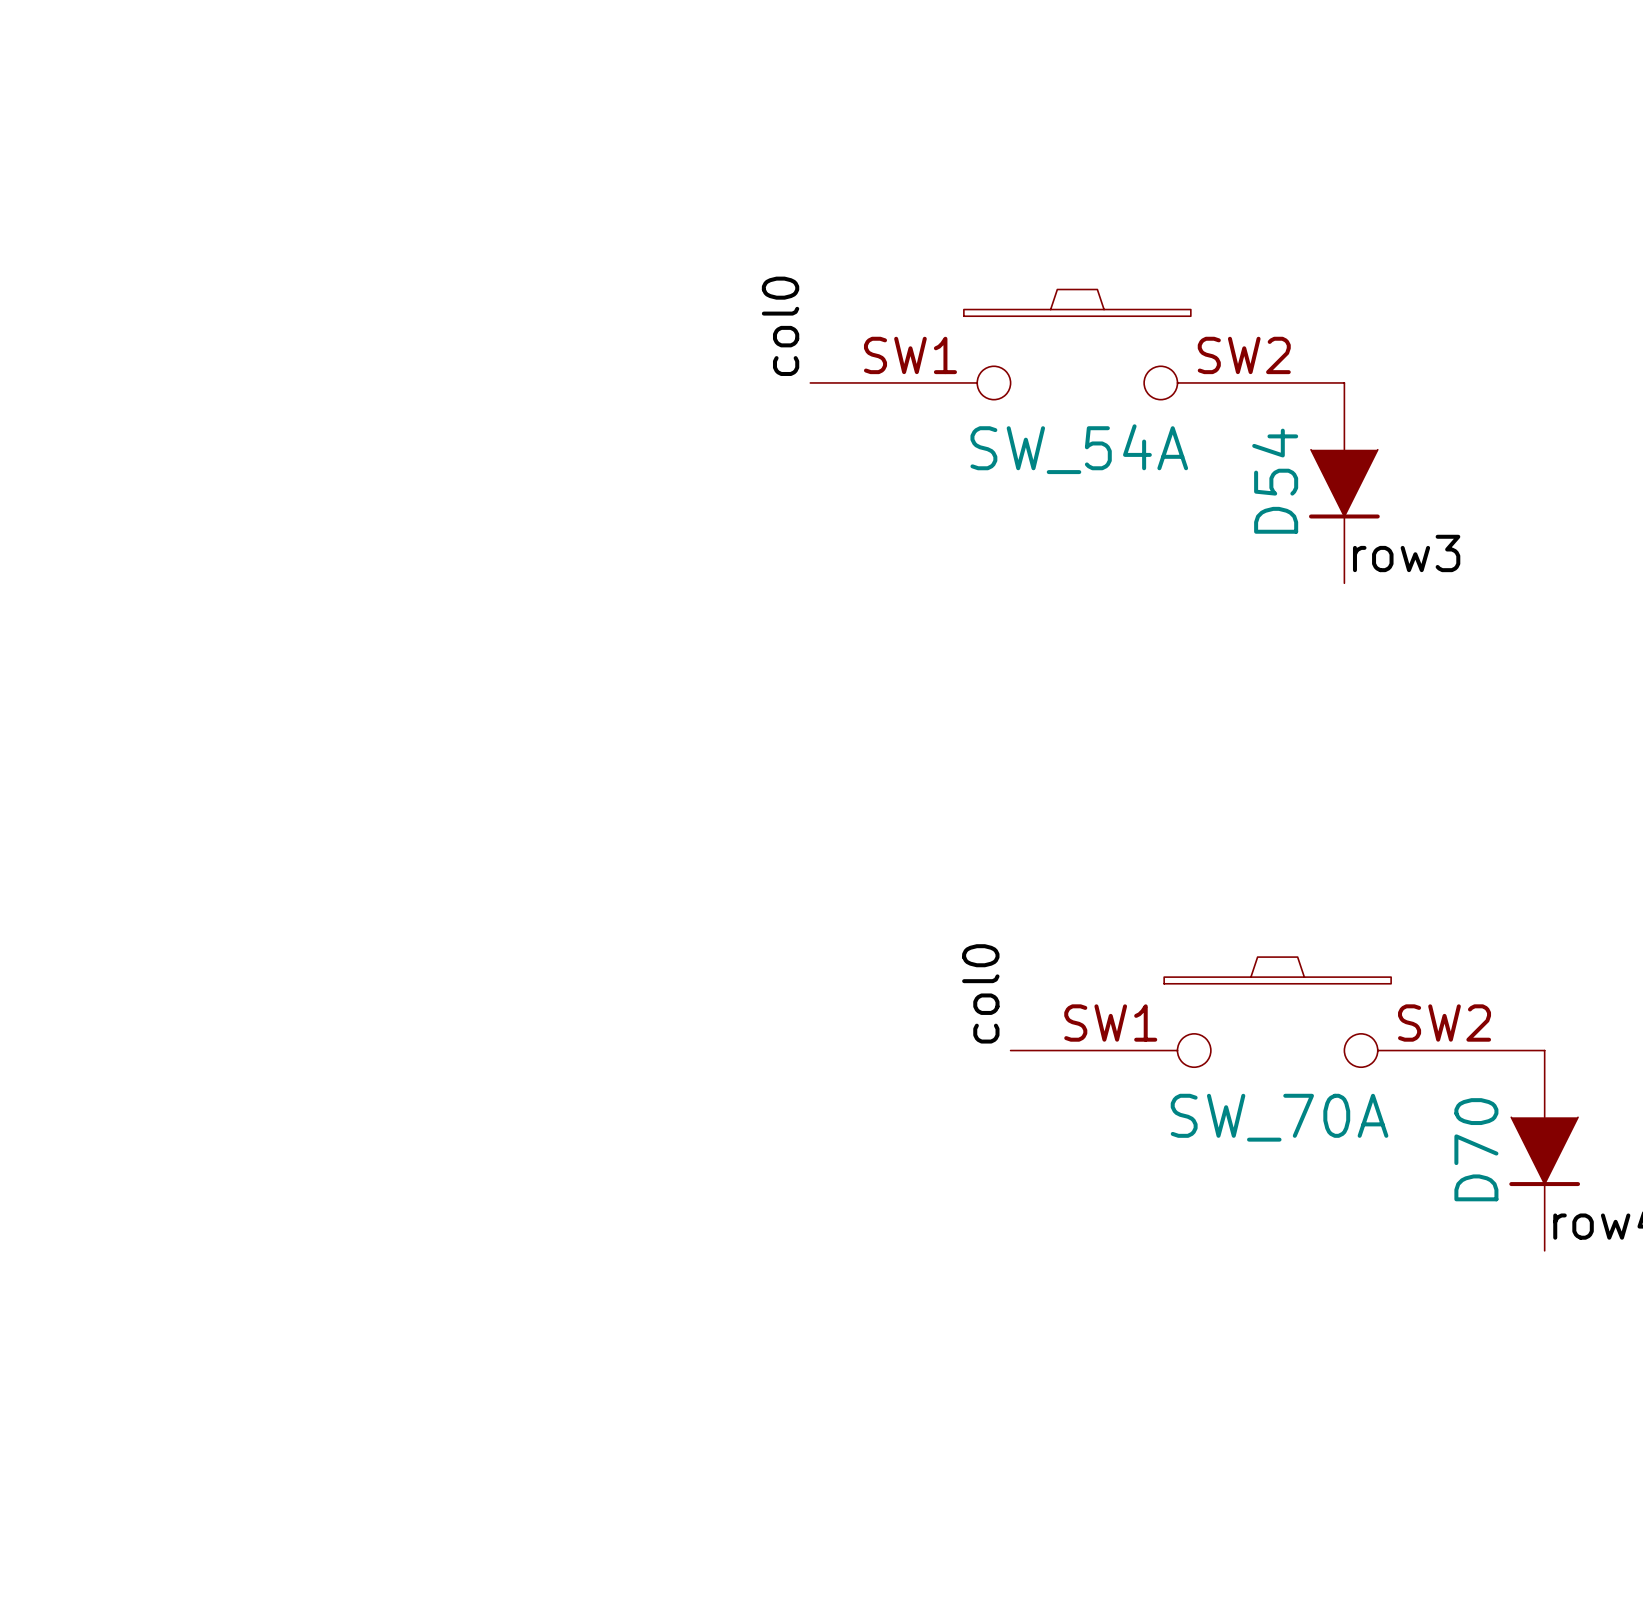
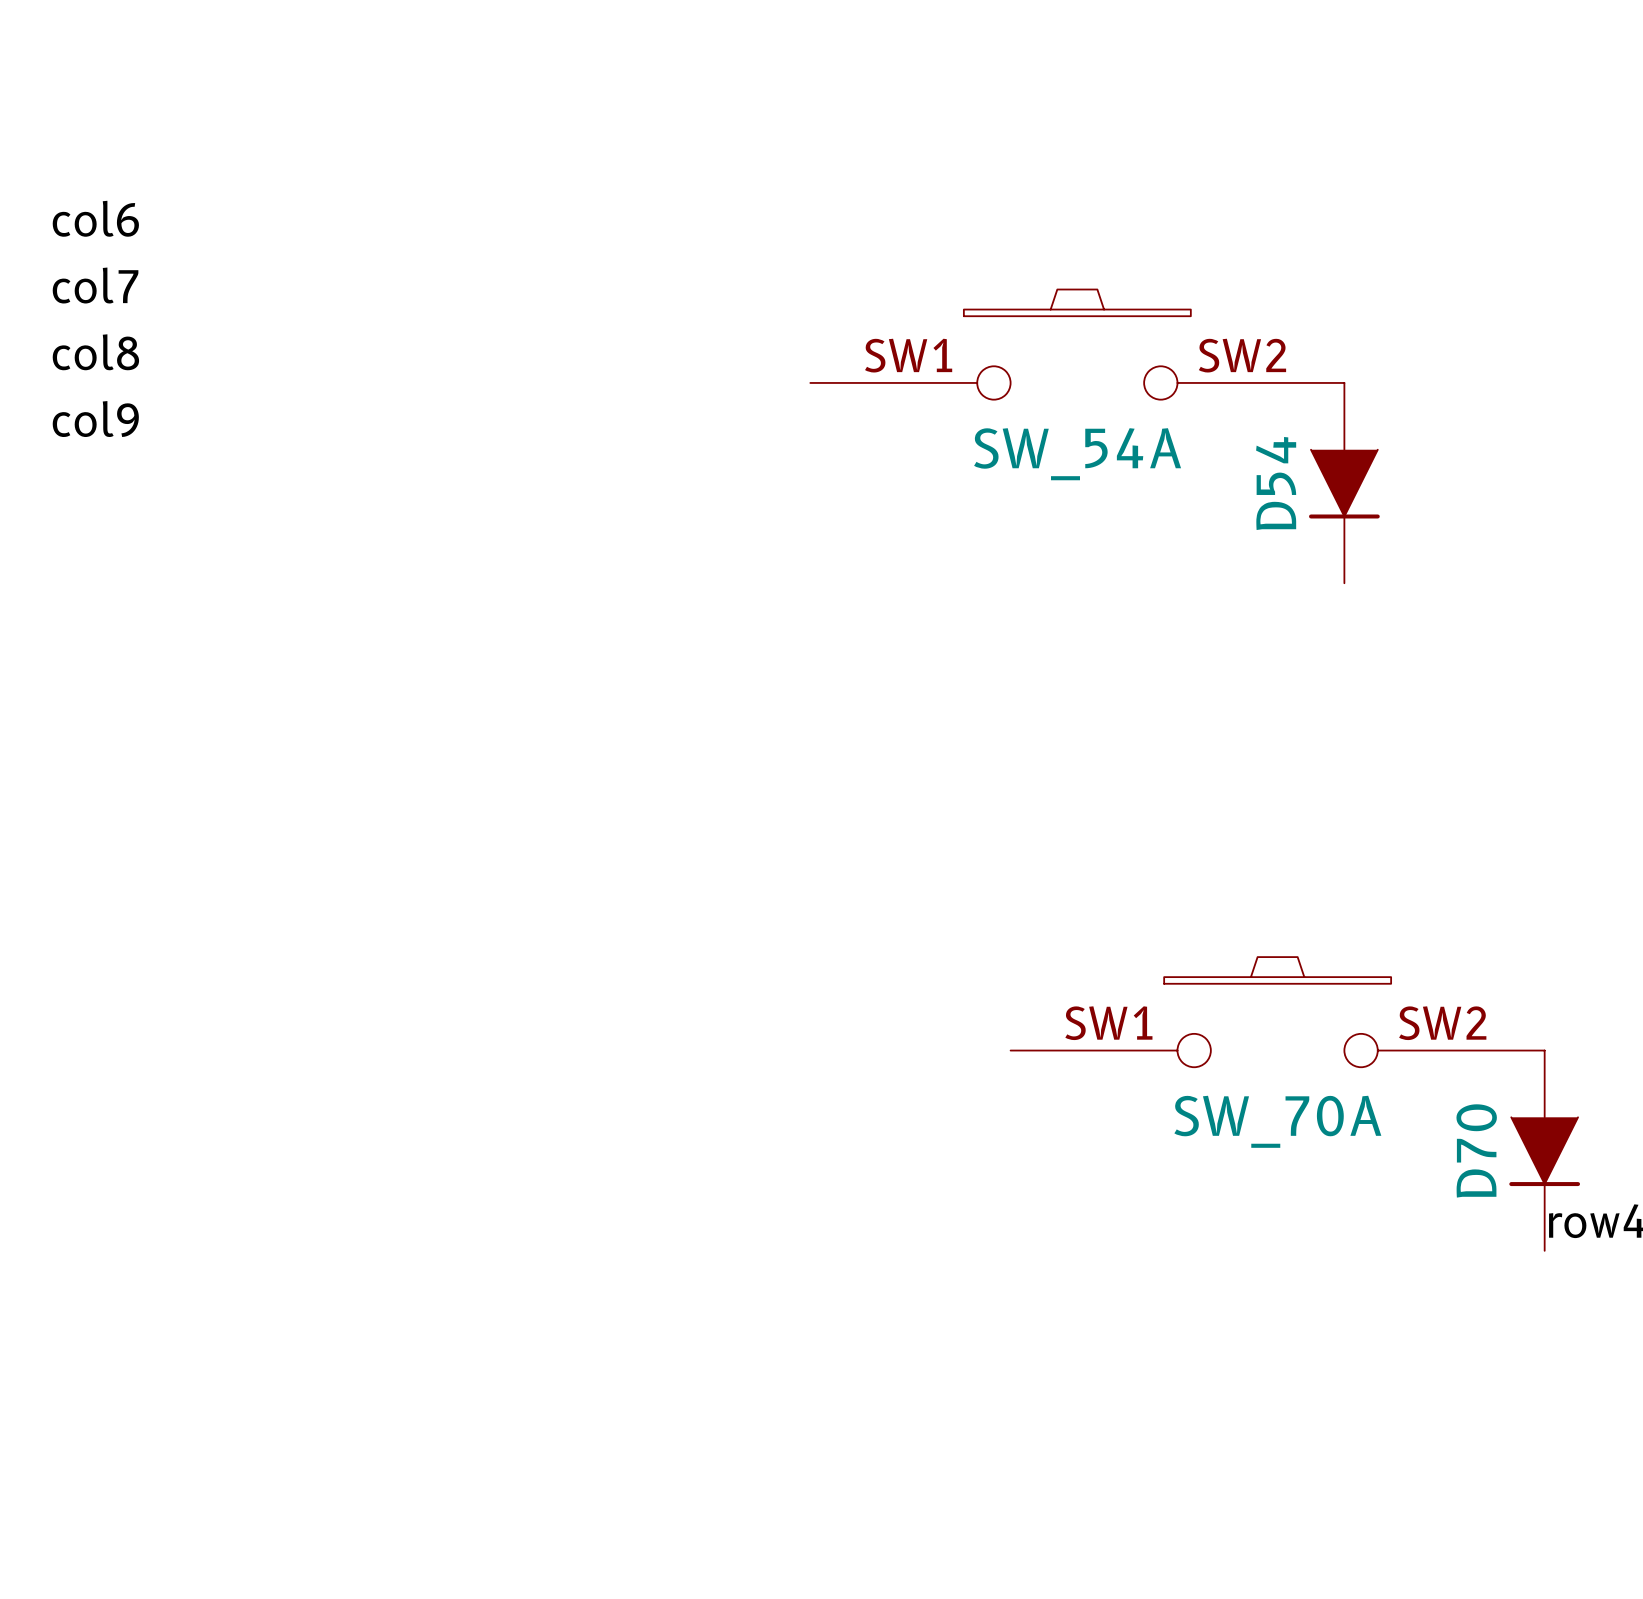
label: none -> col6 (95, 218)
label: none -> col7 (95, 285)
label: col0 (780, 326) -> none
label: none -> col8 (95, 352)
label: none -> col9 (95, 419)
label: row3 (1406, 553) -> none
label: col0 (980, 993) -> none

